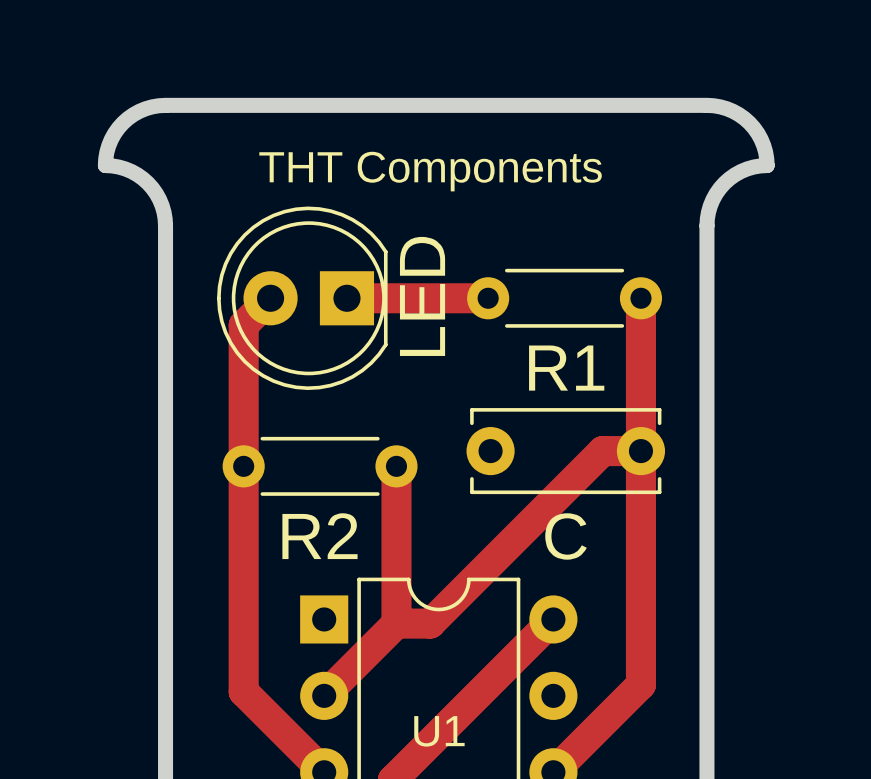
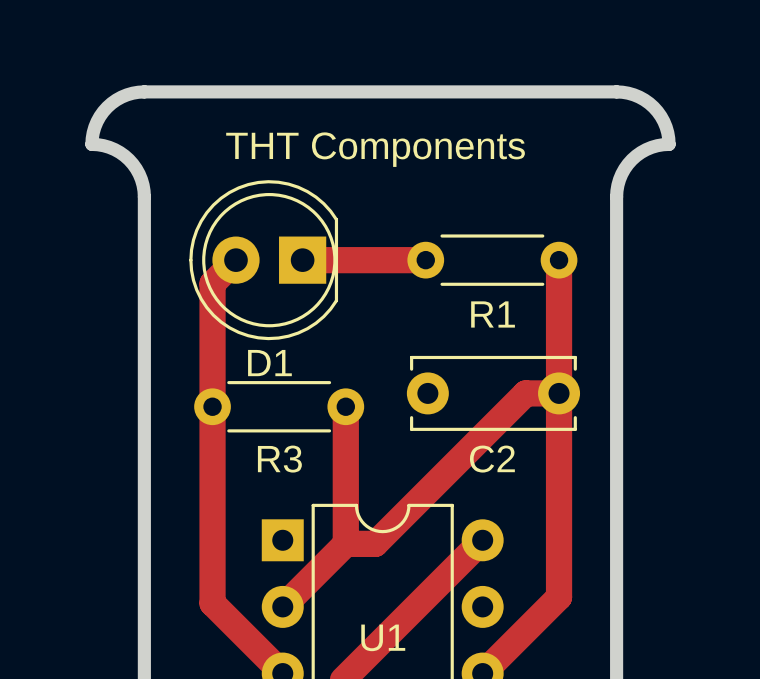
text: LED (422, 296) -> none
R1 name: none -> R1 (493, 314)
text: R1 (566, 368) -> none
D1 name: none -> D1 (269, 363)
R3 name: none -> R3 (279, 459)
C2 name: none -> C2 (492, 459)
text: R2 (319, 536) -> none
text: C (566, 536) -> none

